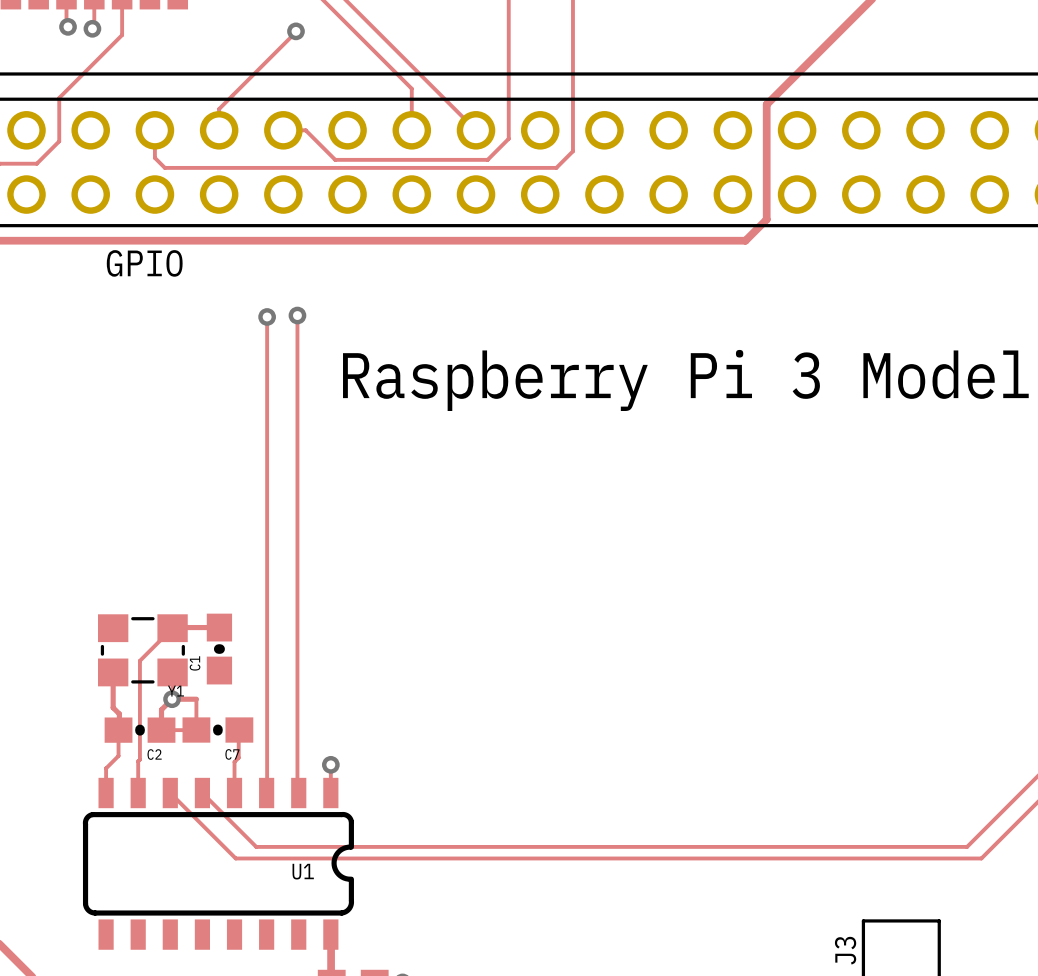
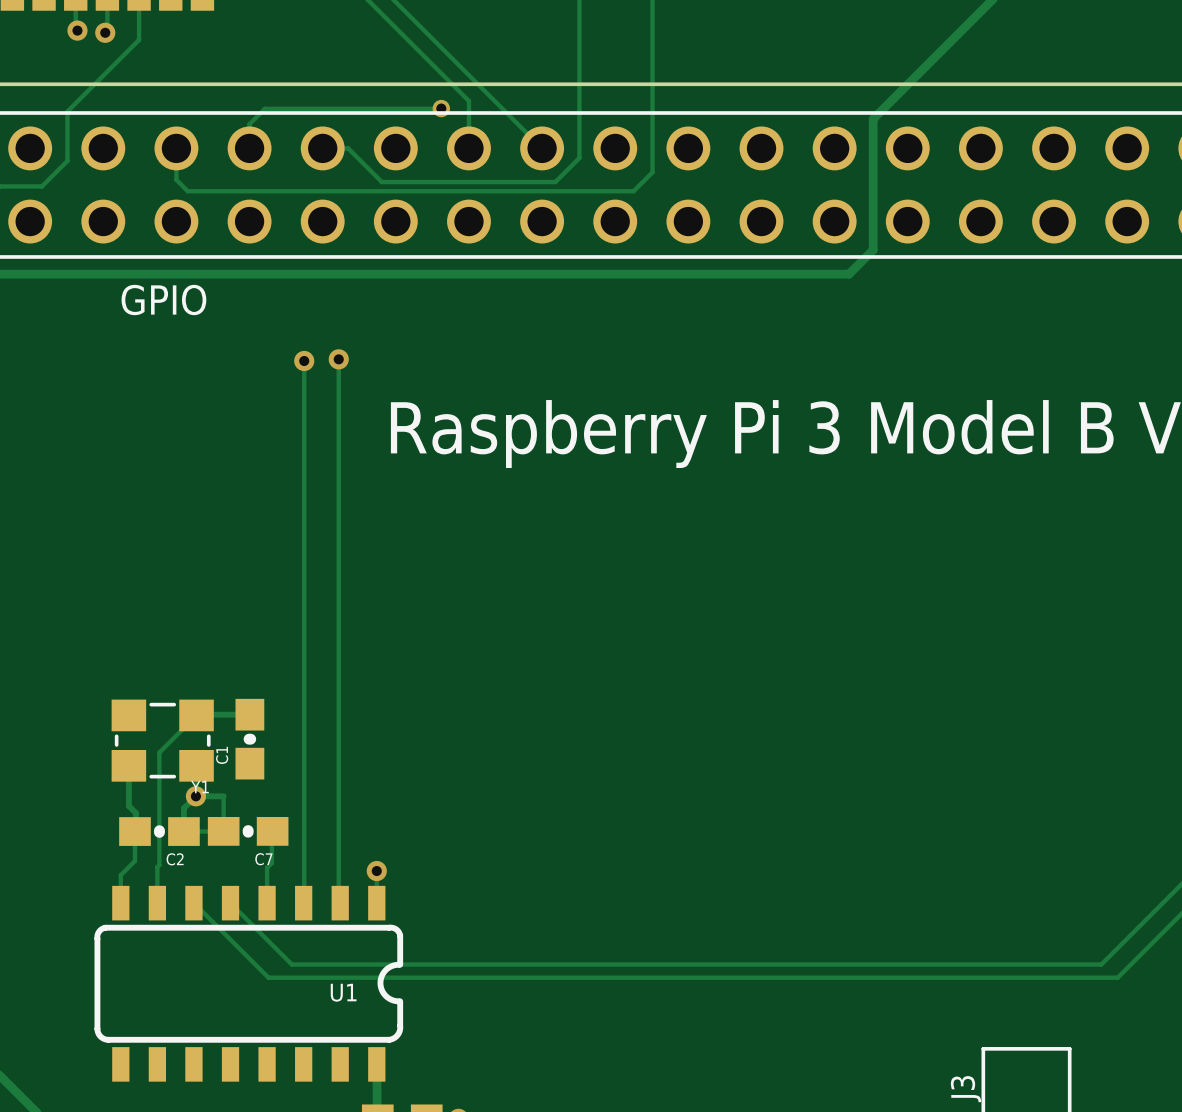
track: (295, 31) (232, 95) -> (441, 108) (264, 108)
via: (295, 31) -> none
via: none -> (441, 108)

